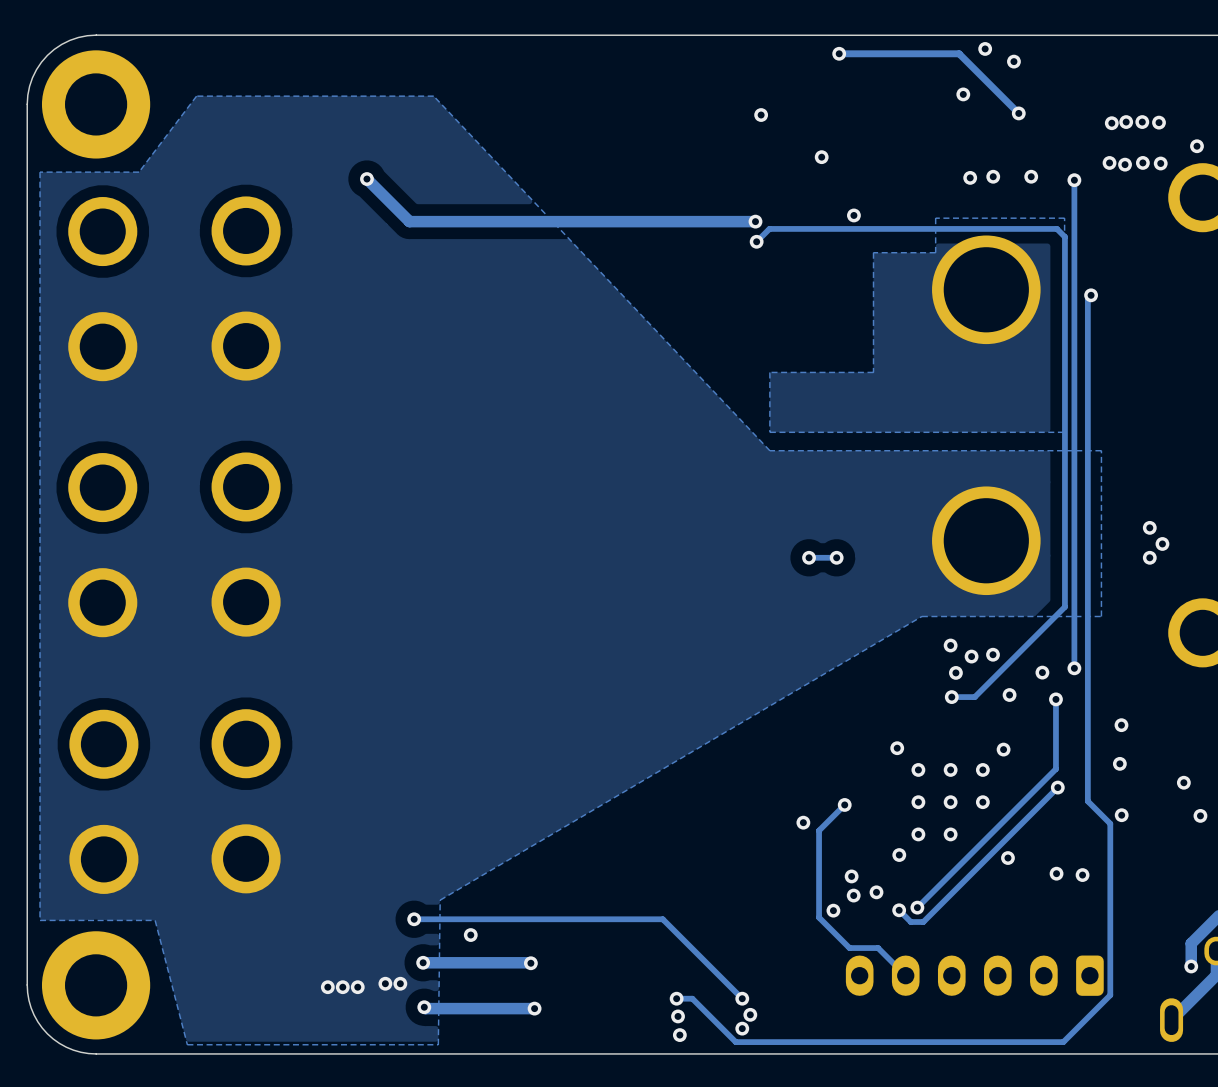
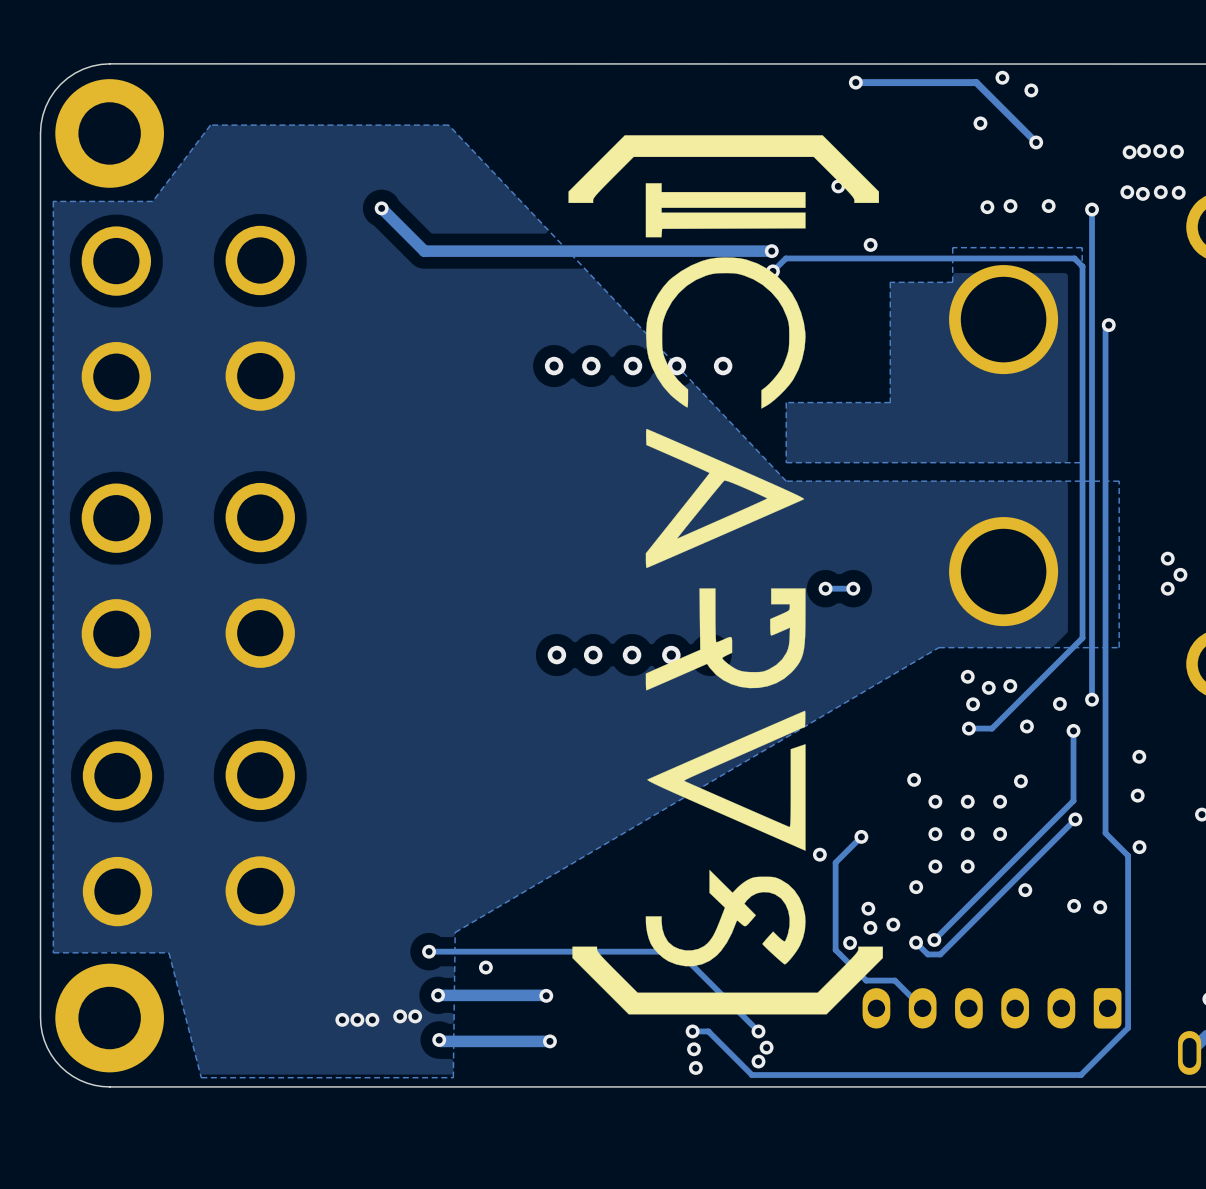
drawing: none -> [568, 135, 883, 1015]
via: none -> (554, 366)
via: none -> (591, 366)
via: none -> (632, 366)
via: none -> (676, 366)
via: none -> (723, 366)
via: none -> (556, 655)
via: none -> (593, 655)
via: none -> (632, 655)
via: none -> (671, 655)

